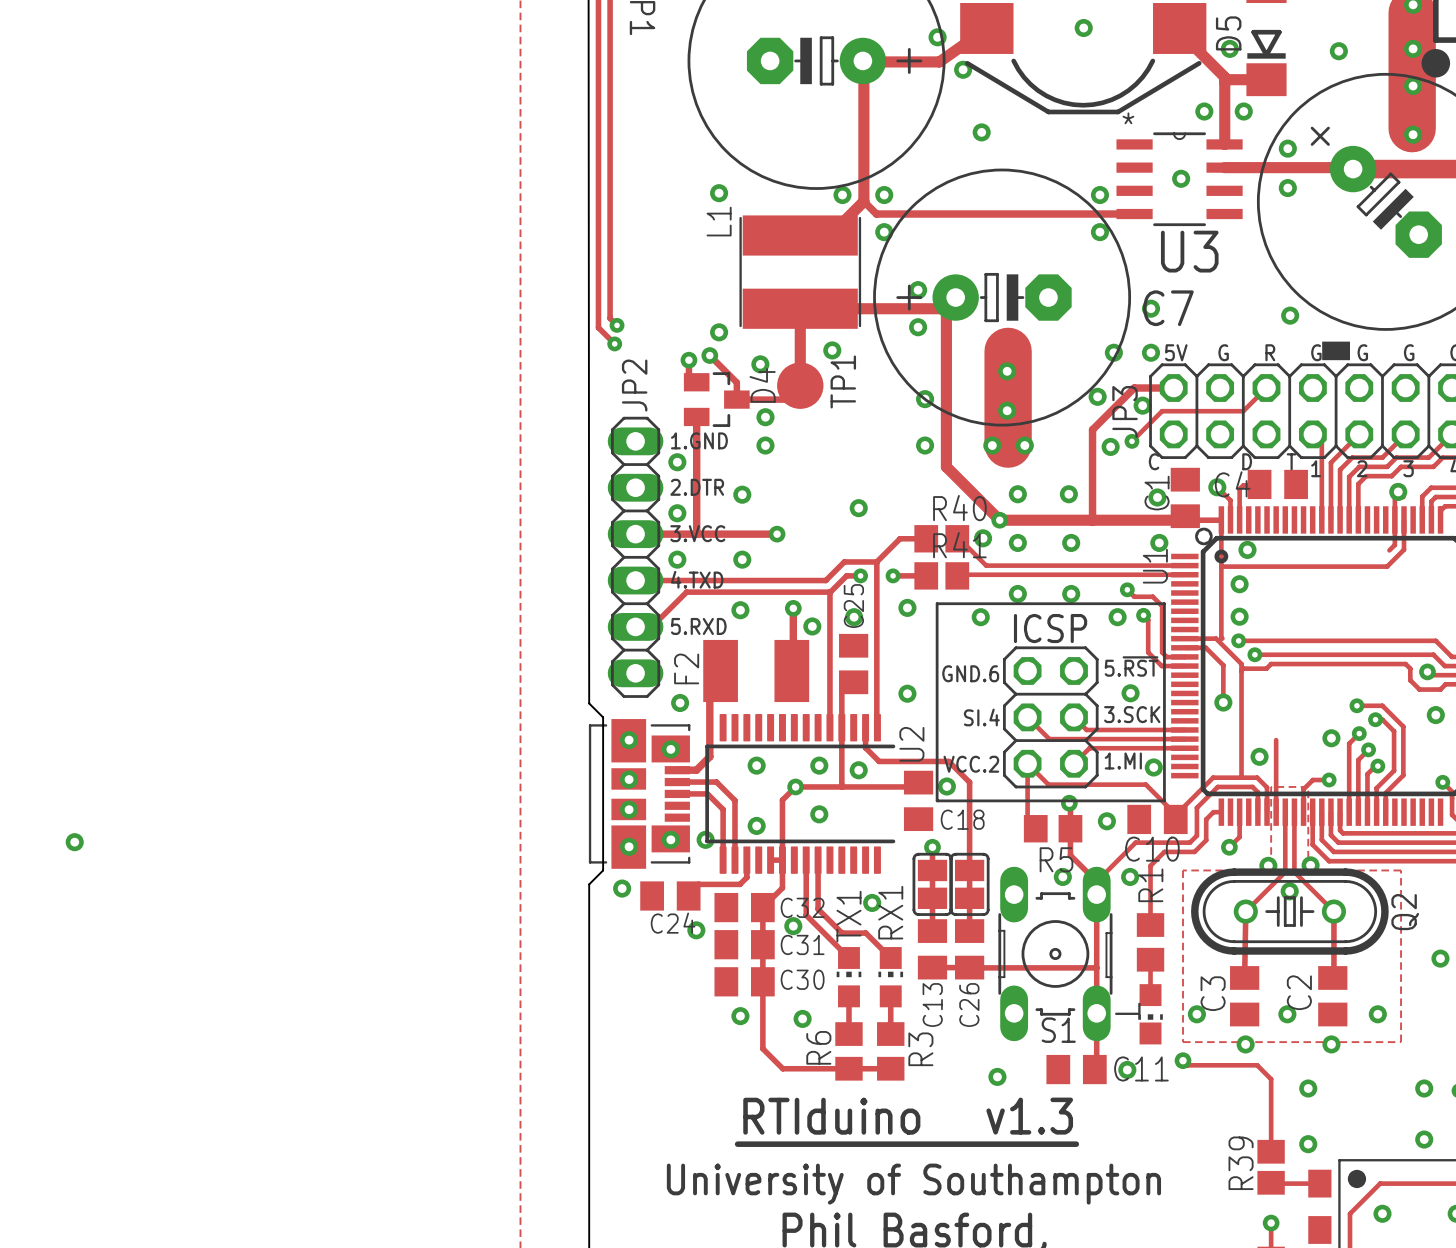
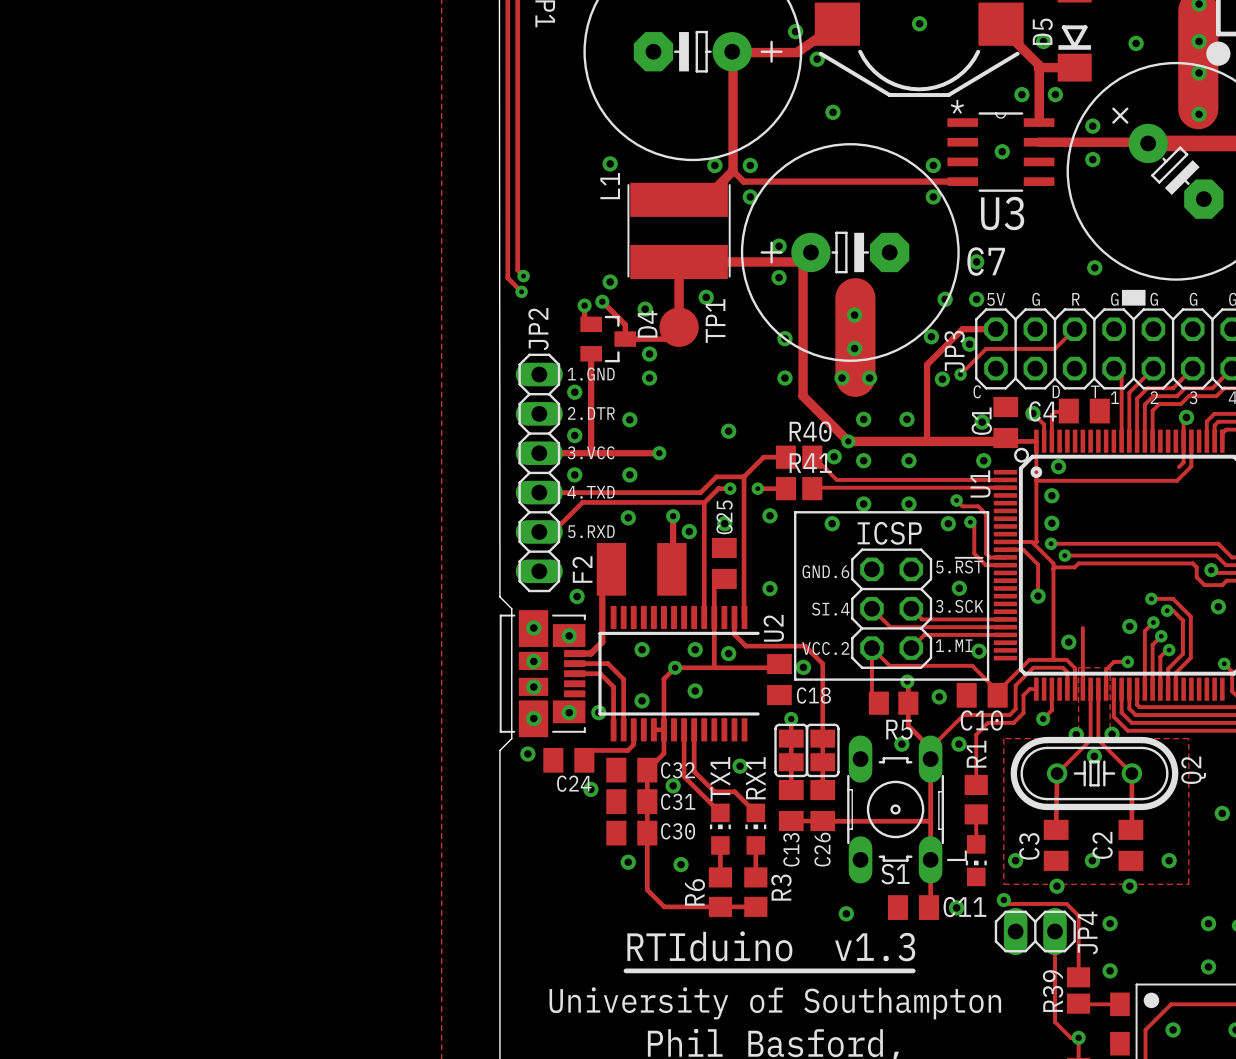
via: (74, 842) -> none
JP4: none -> (1035, 931)
track: none -> (1055, 931) (1055, 1022) (1070, 1037) (1078, 1037)

